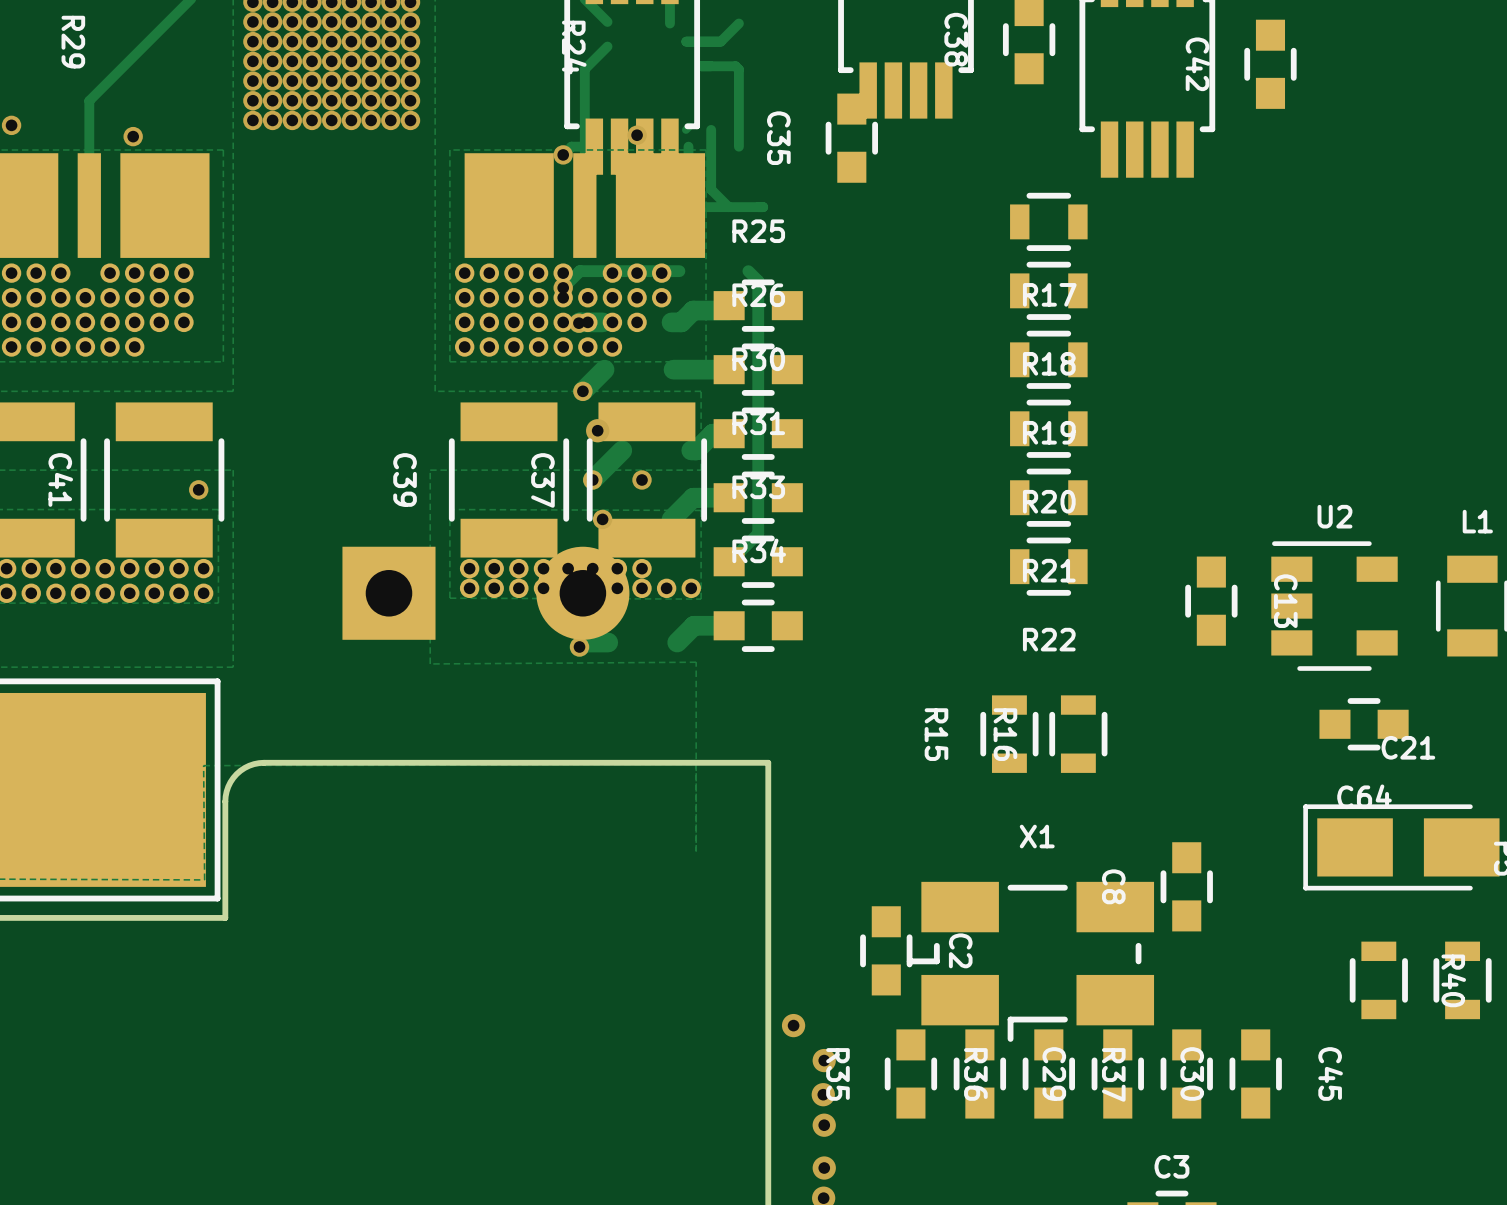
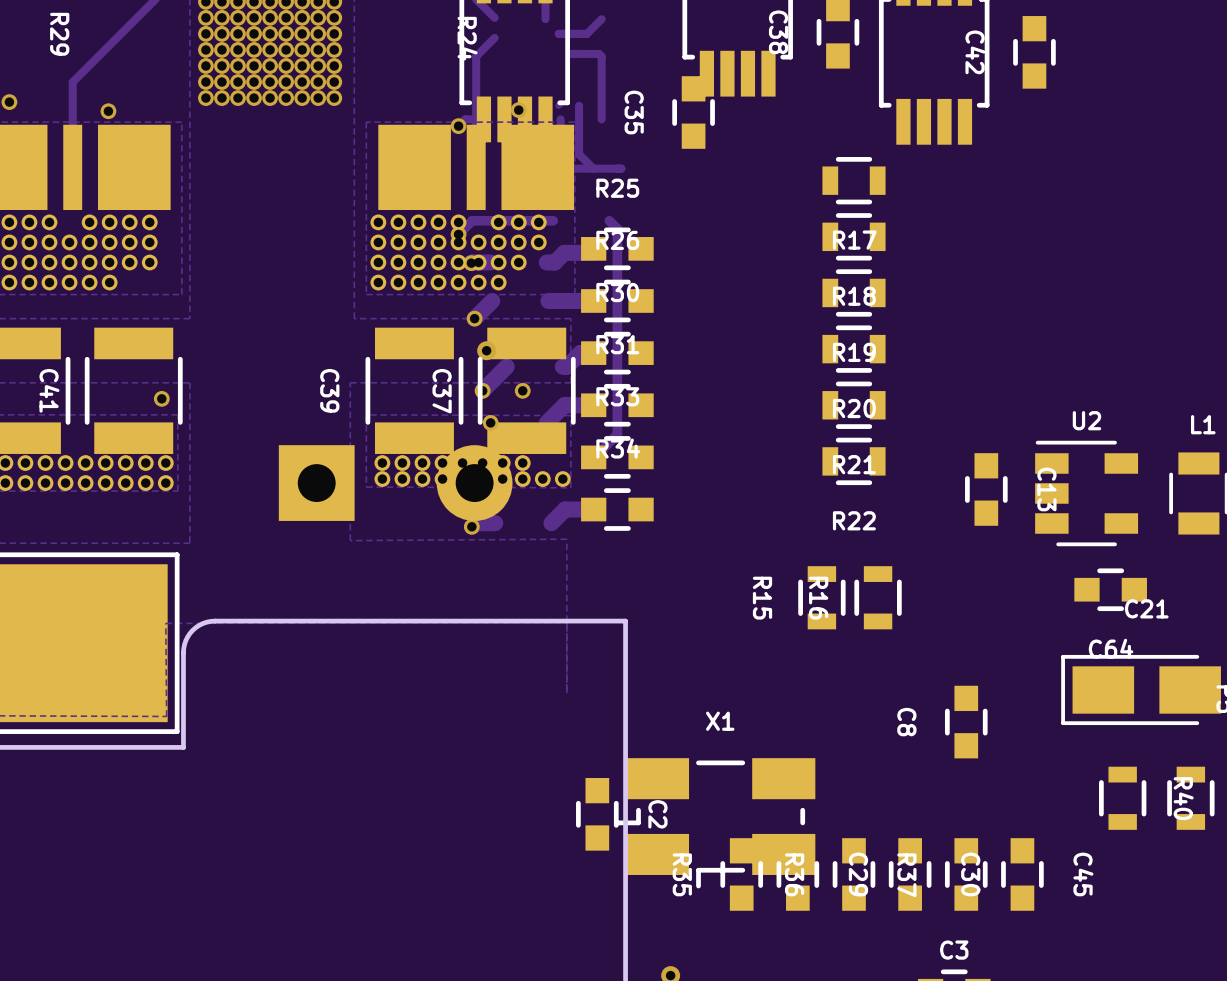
C2 position: (886, 950) -> (597, 814)
X1 position: (1030, 961) -> (714, 823)
via: (793, 1025) -> none
via: (824, 1060) -> none
via: (823, 1094) -> none
via: (824, 1125) -> none
via: (824, 1168) -> none

